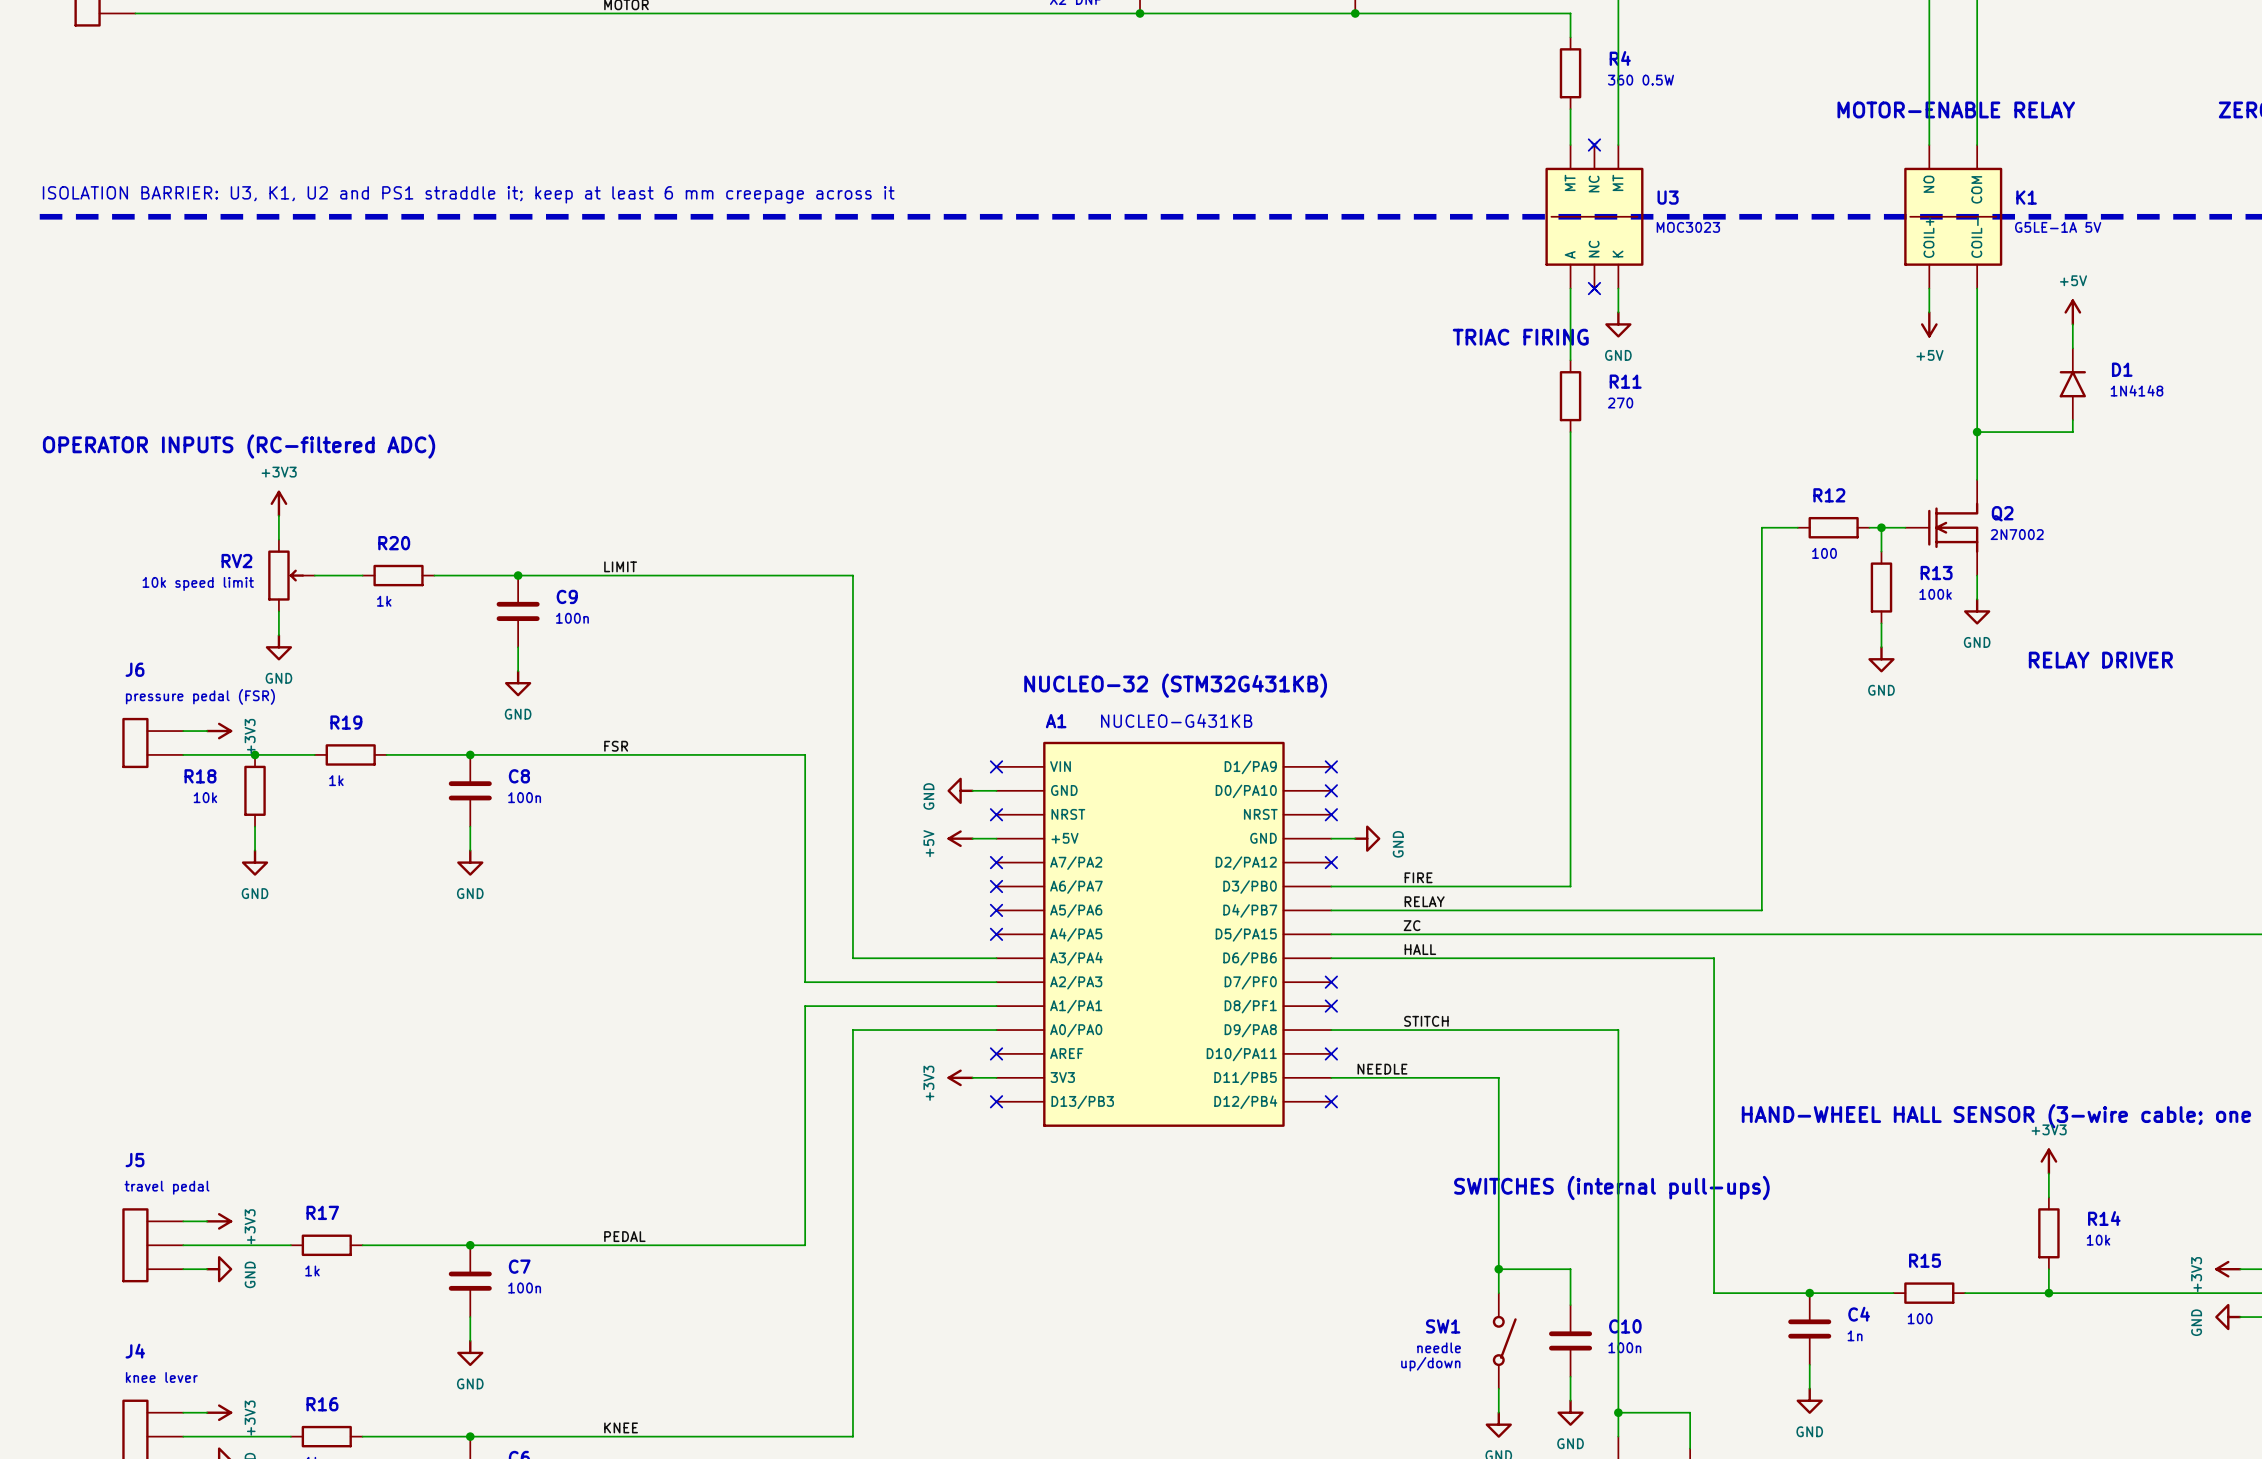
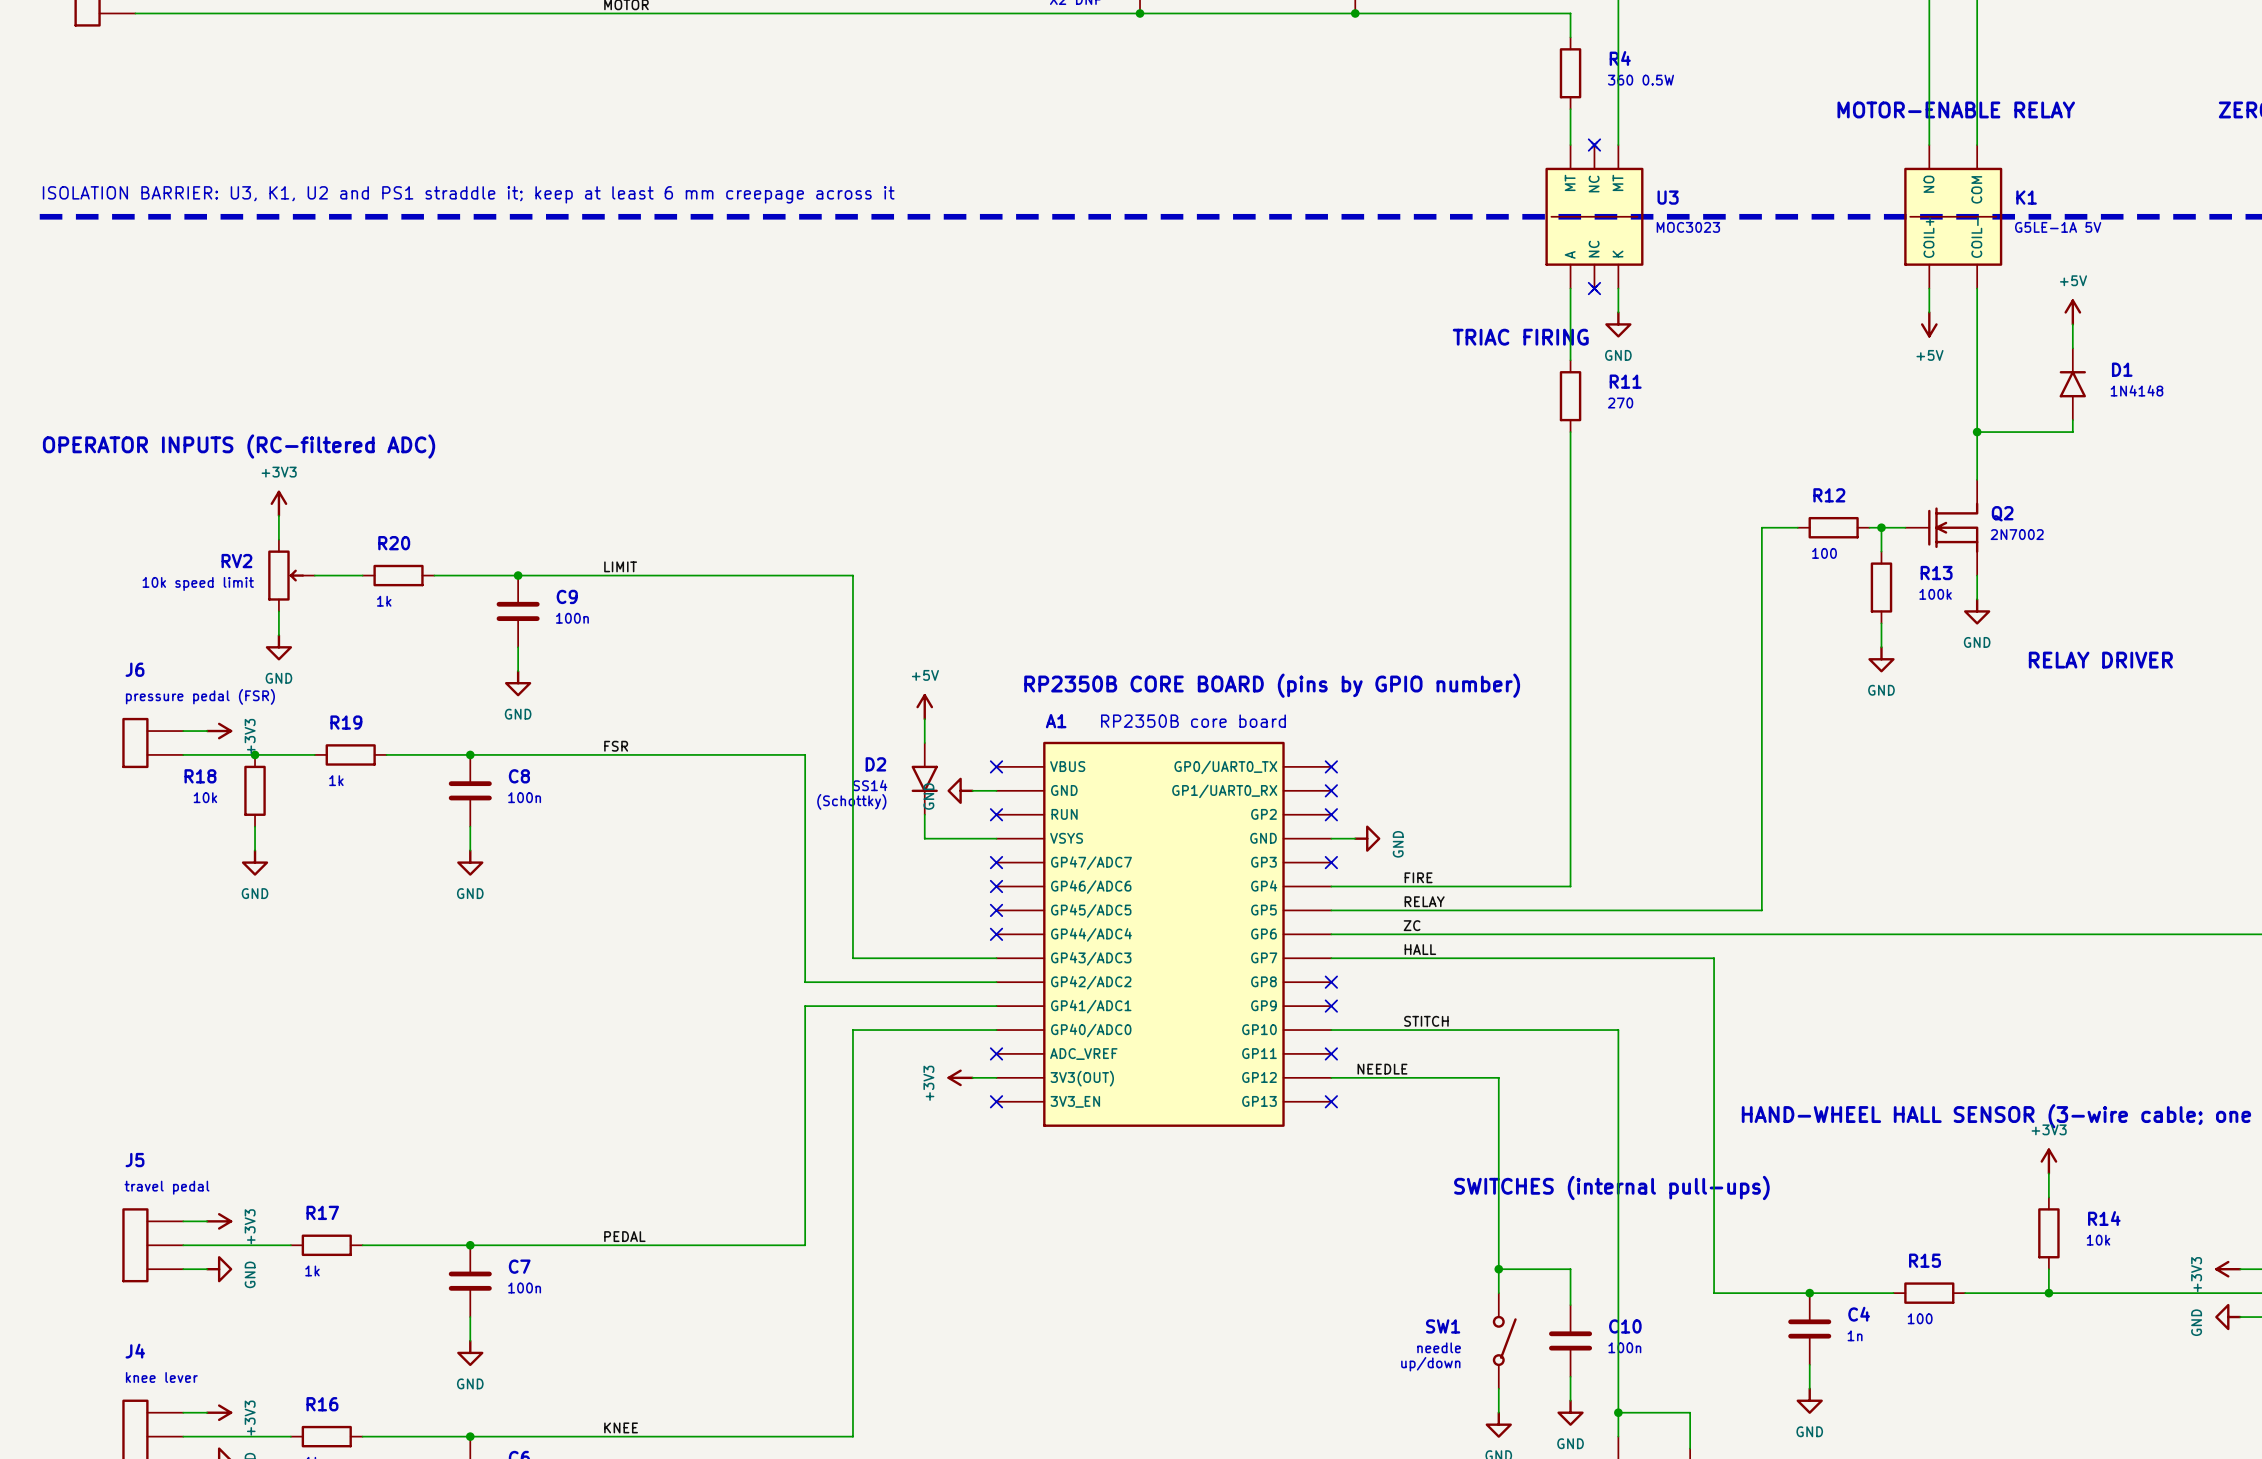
text: NUCLEO-32 (STM32G431KB) (1175, 685) -> RP2350B CORE BOARD (pins by GPIO number) (1272, 685)
wire: none -> (924, 719) (924, 742)
text: NUCLEO-G431KB (1176, 720) -> RP2350B core board (1193, 721)
part symbol: [996, 741, 1332, 1127] -> [996, 741, 1332, 1127]
text: none -> D2 (875, 764)
part: none -> (924, 778)
text: none -> SS14 (870, 785)
text: none -> (Schottky) (851, 801)
wire: none -> (924, 814) (924, 838) (972, 838)
power symbol rotation: 0° (960, 838) -> 90° clockwise (924, 707)
power symbol position: +5V (960, 838) -> +5V (924, 707)

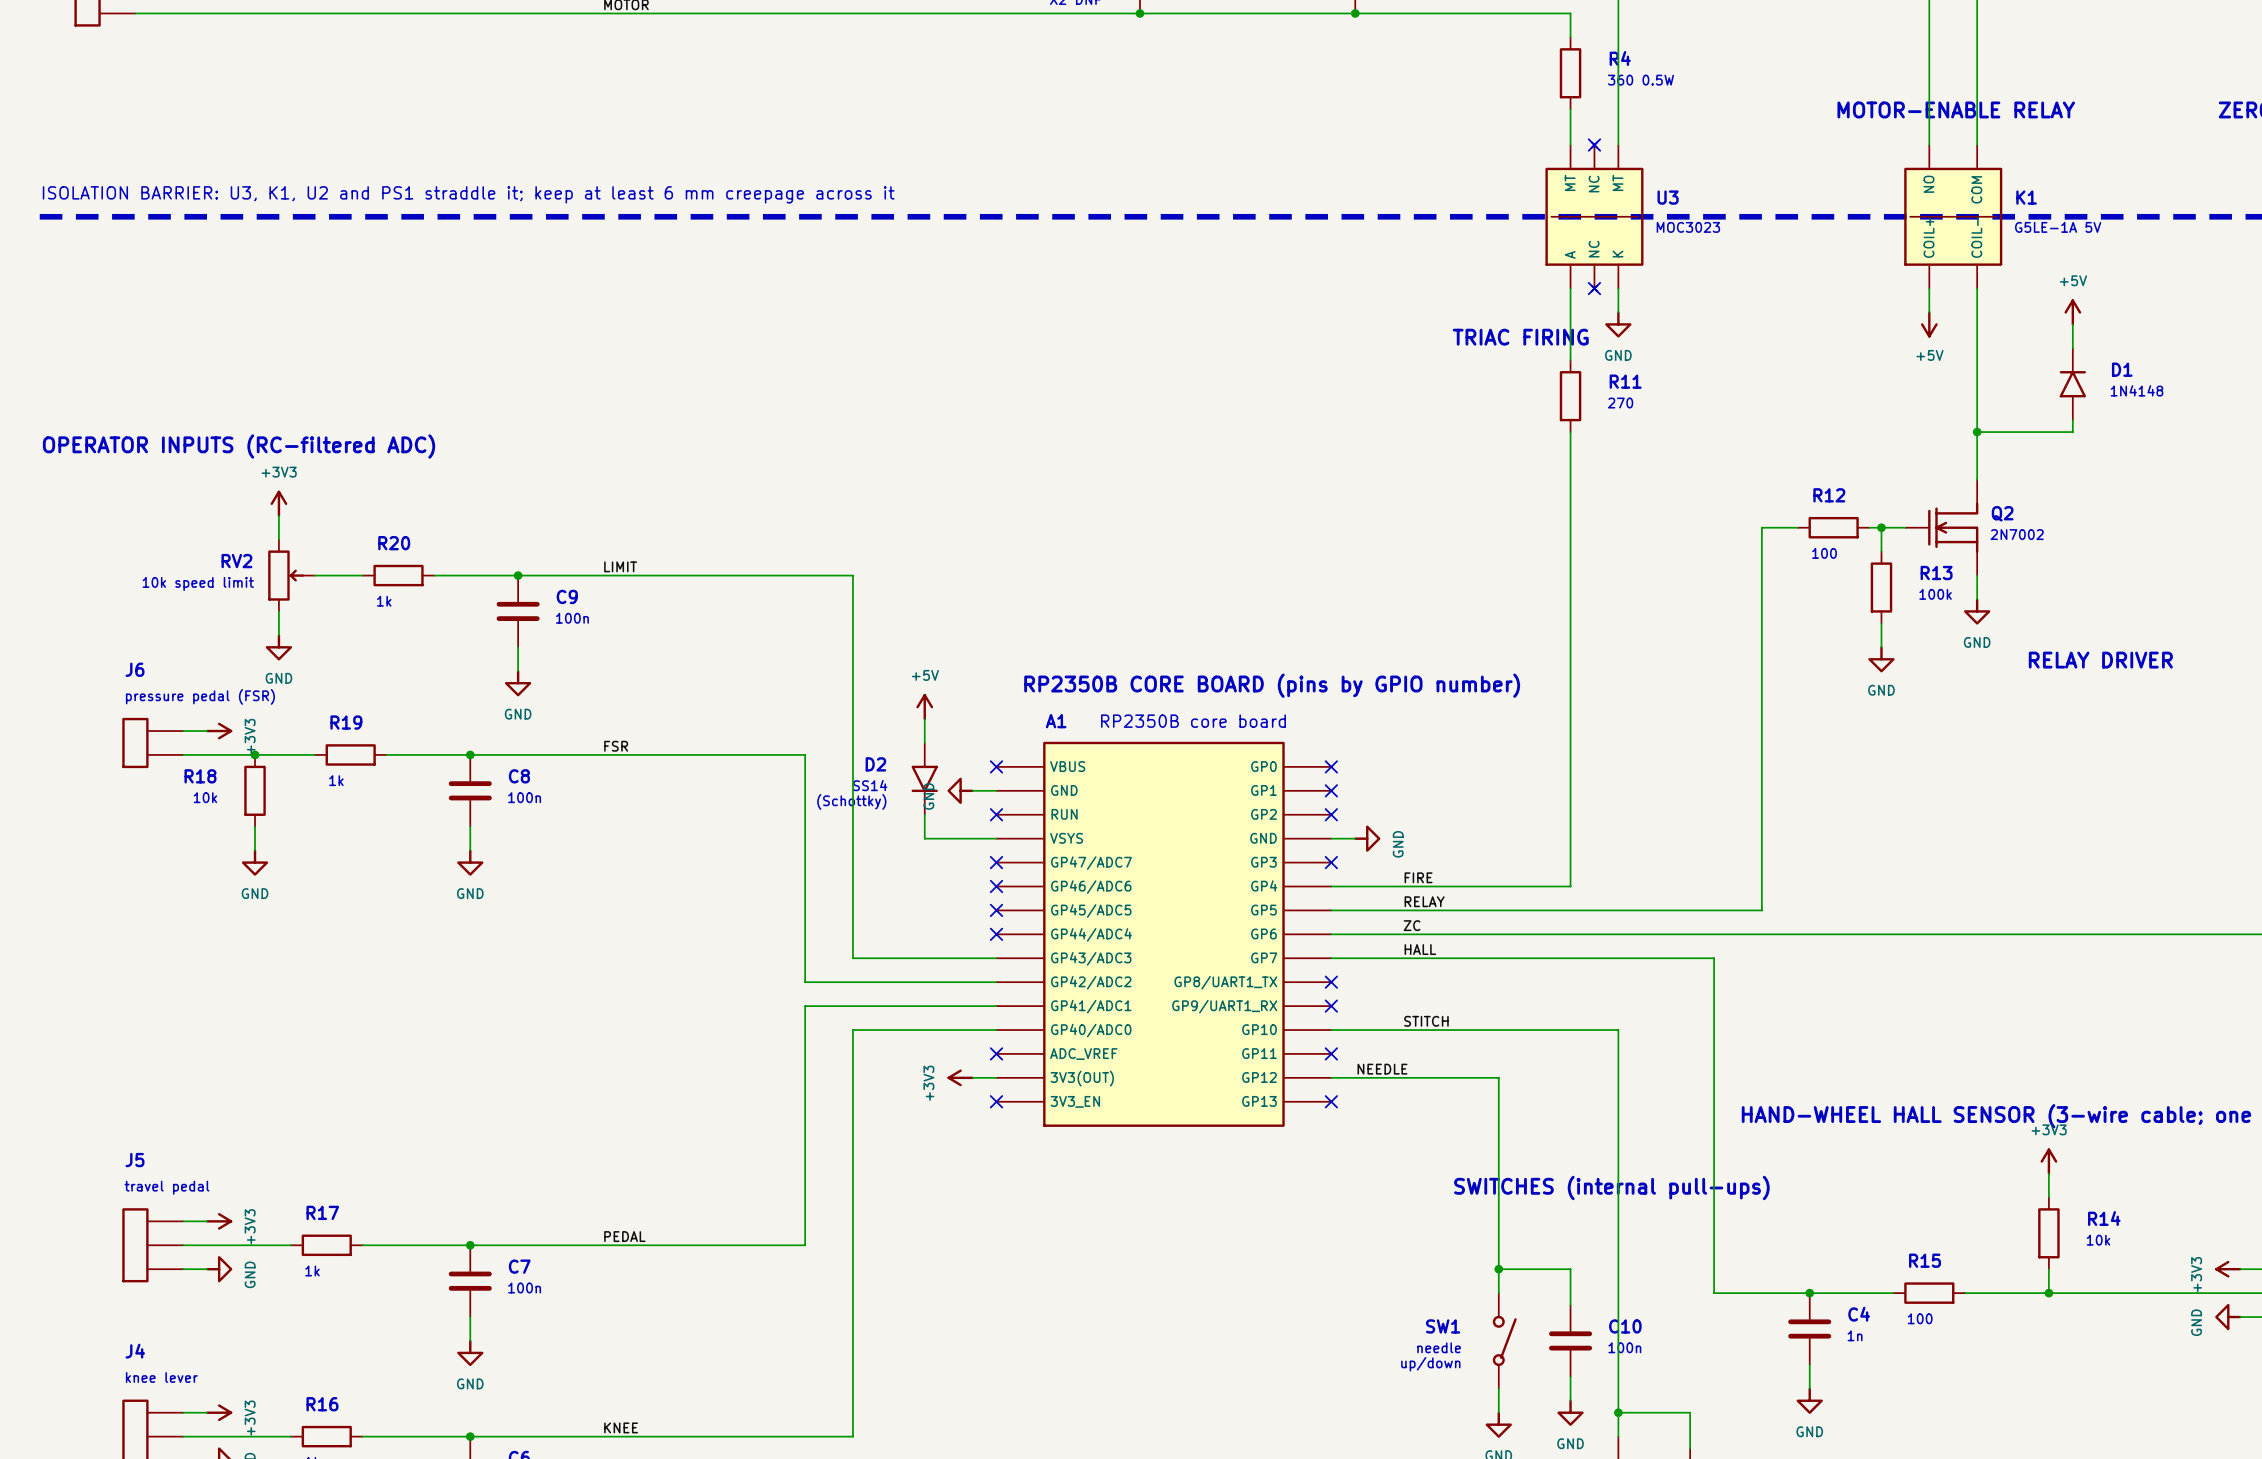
part pin name: GP0/UART0_TX (1225, 767) -> GP0 (1263, 766)
part pin name: GP1/UART0_RX (1224, 791) -> GP1 (1263, 790)
part pin name: GP8 (1263, 981) -> GP8/UART1_TX (1225, 982)
part pin name: GP9 (1263, 1005) -> GP9/UART1_RX (1224, 1006)

